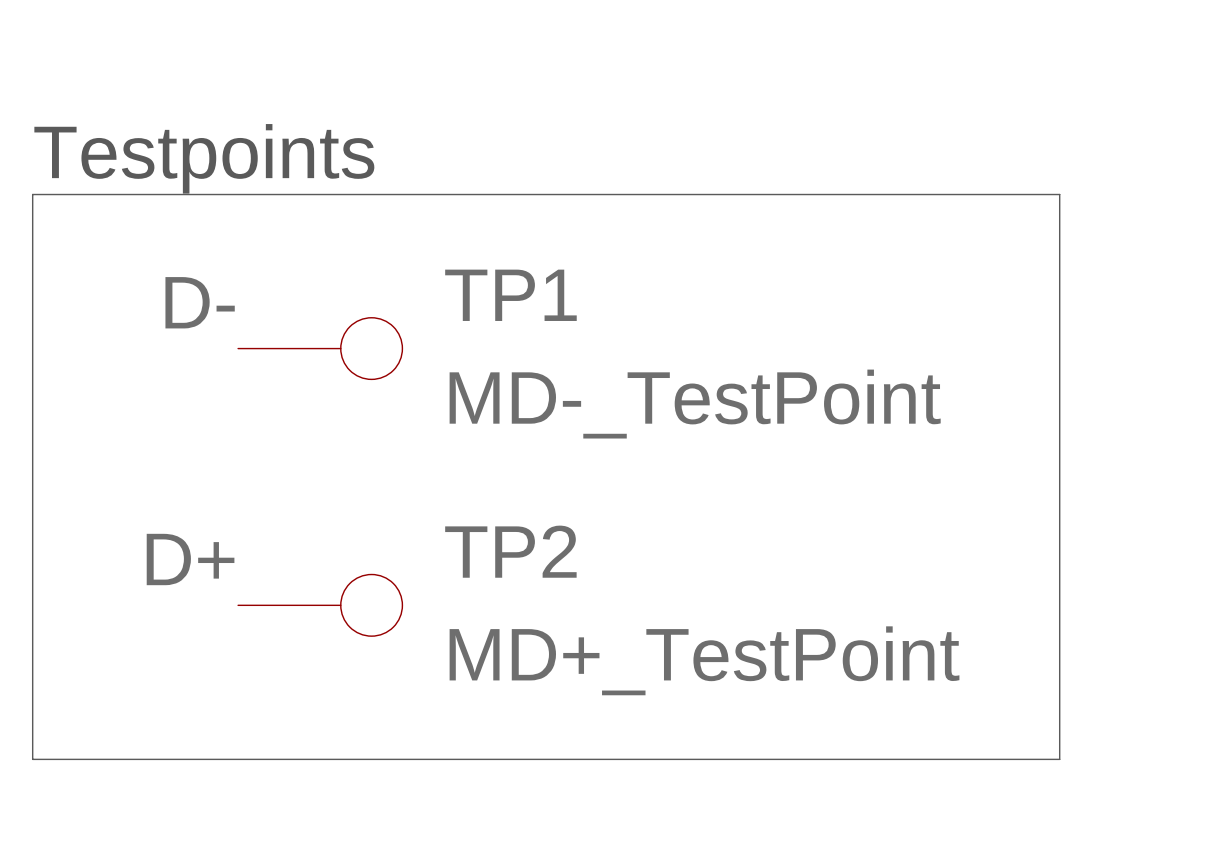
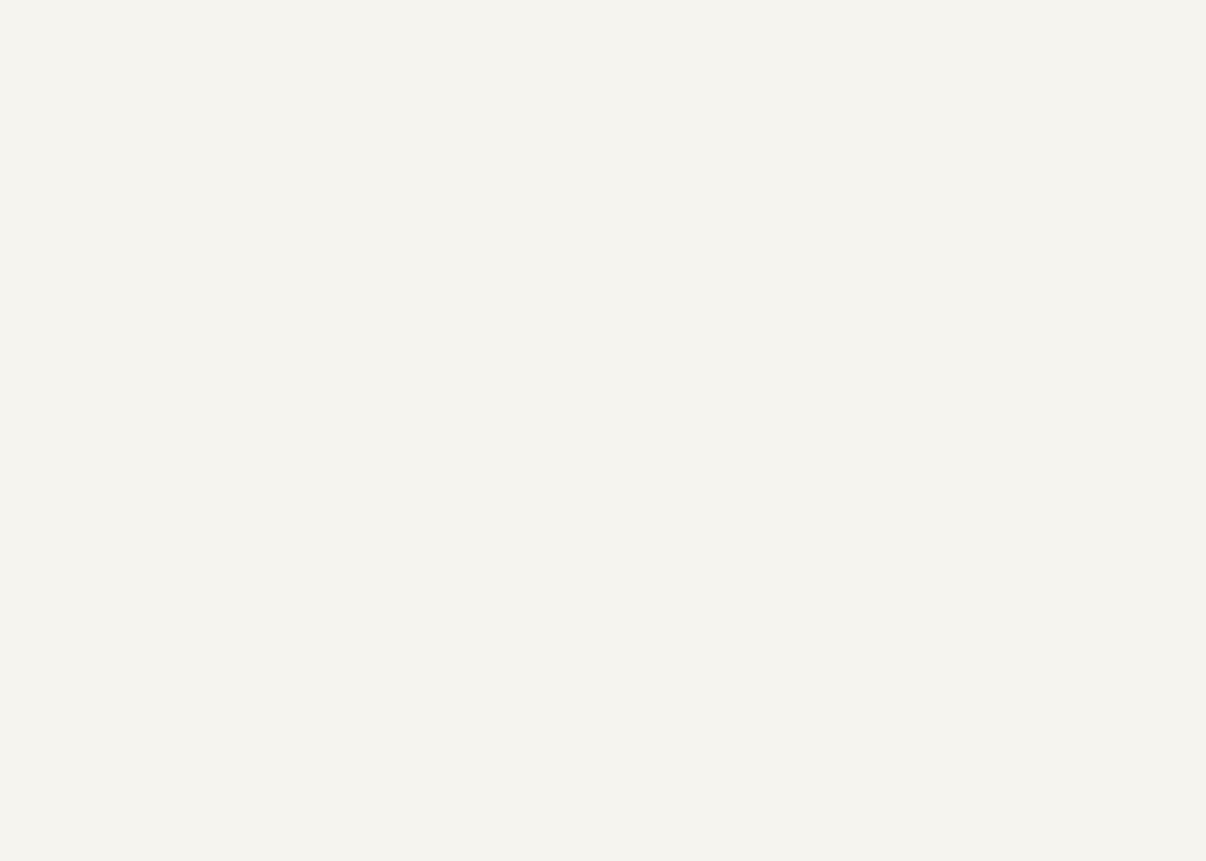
text: Testpoints (204, 158) -> none
line: (32, 194) (32, 759) (1059, 759) (1059, 194) (32, 194) -> none
label: D- (200, 302) -> none
TP1: MD-_TestPoint (320, 348) -> none
label: D+ (190, 559) -> none
TP2: MD+_TestPoint (320, 605) -> none

